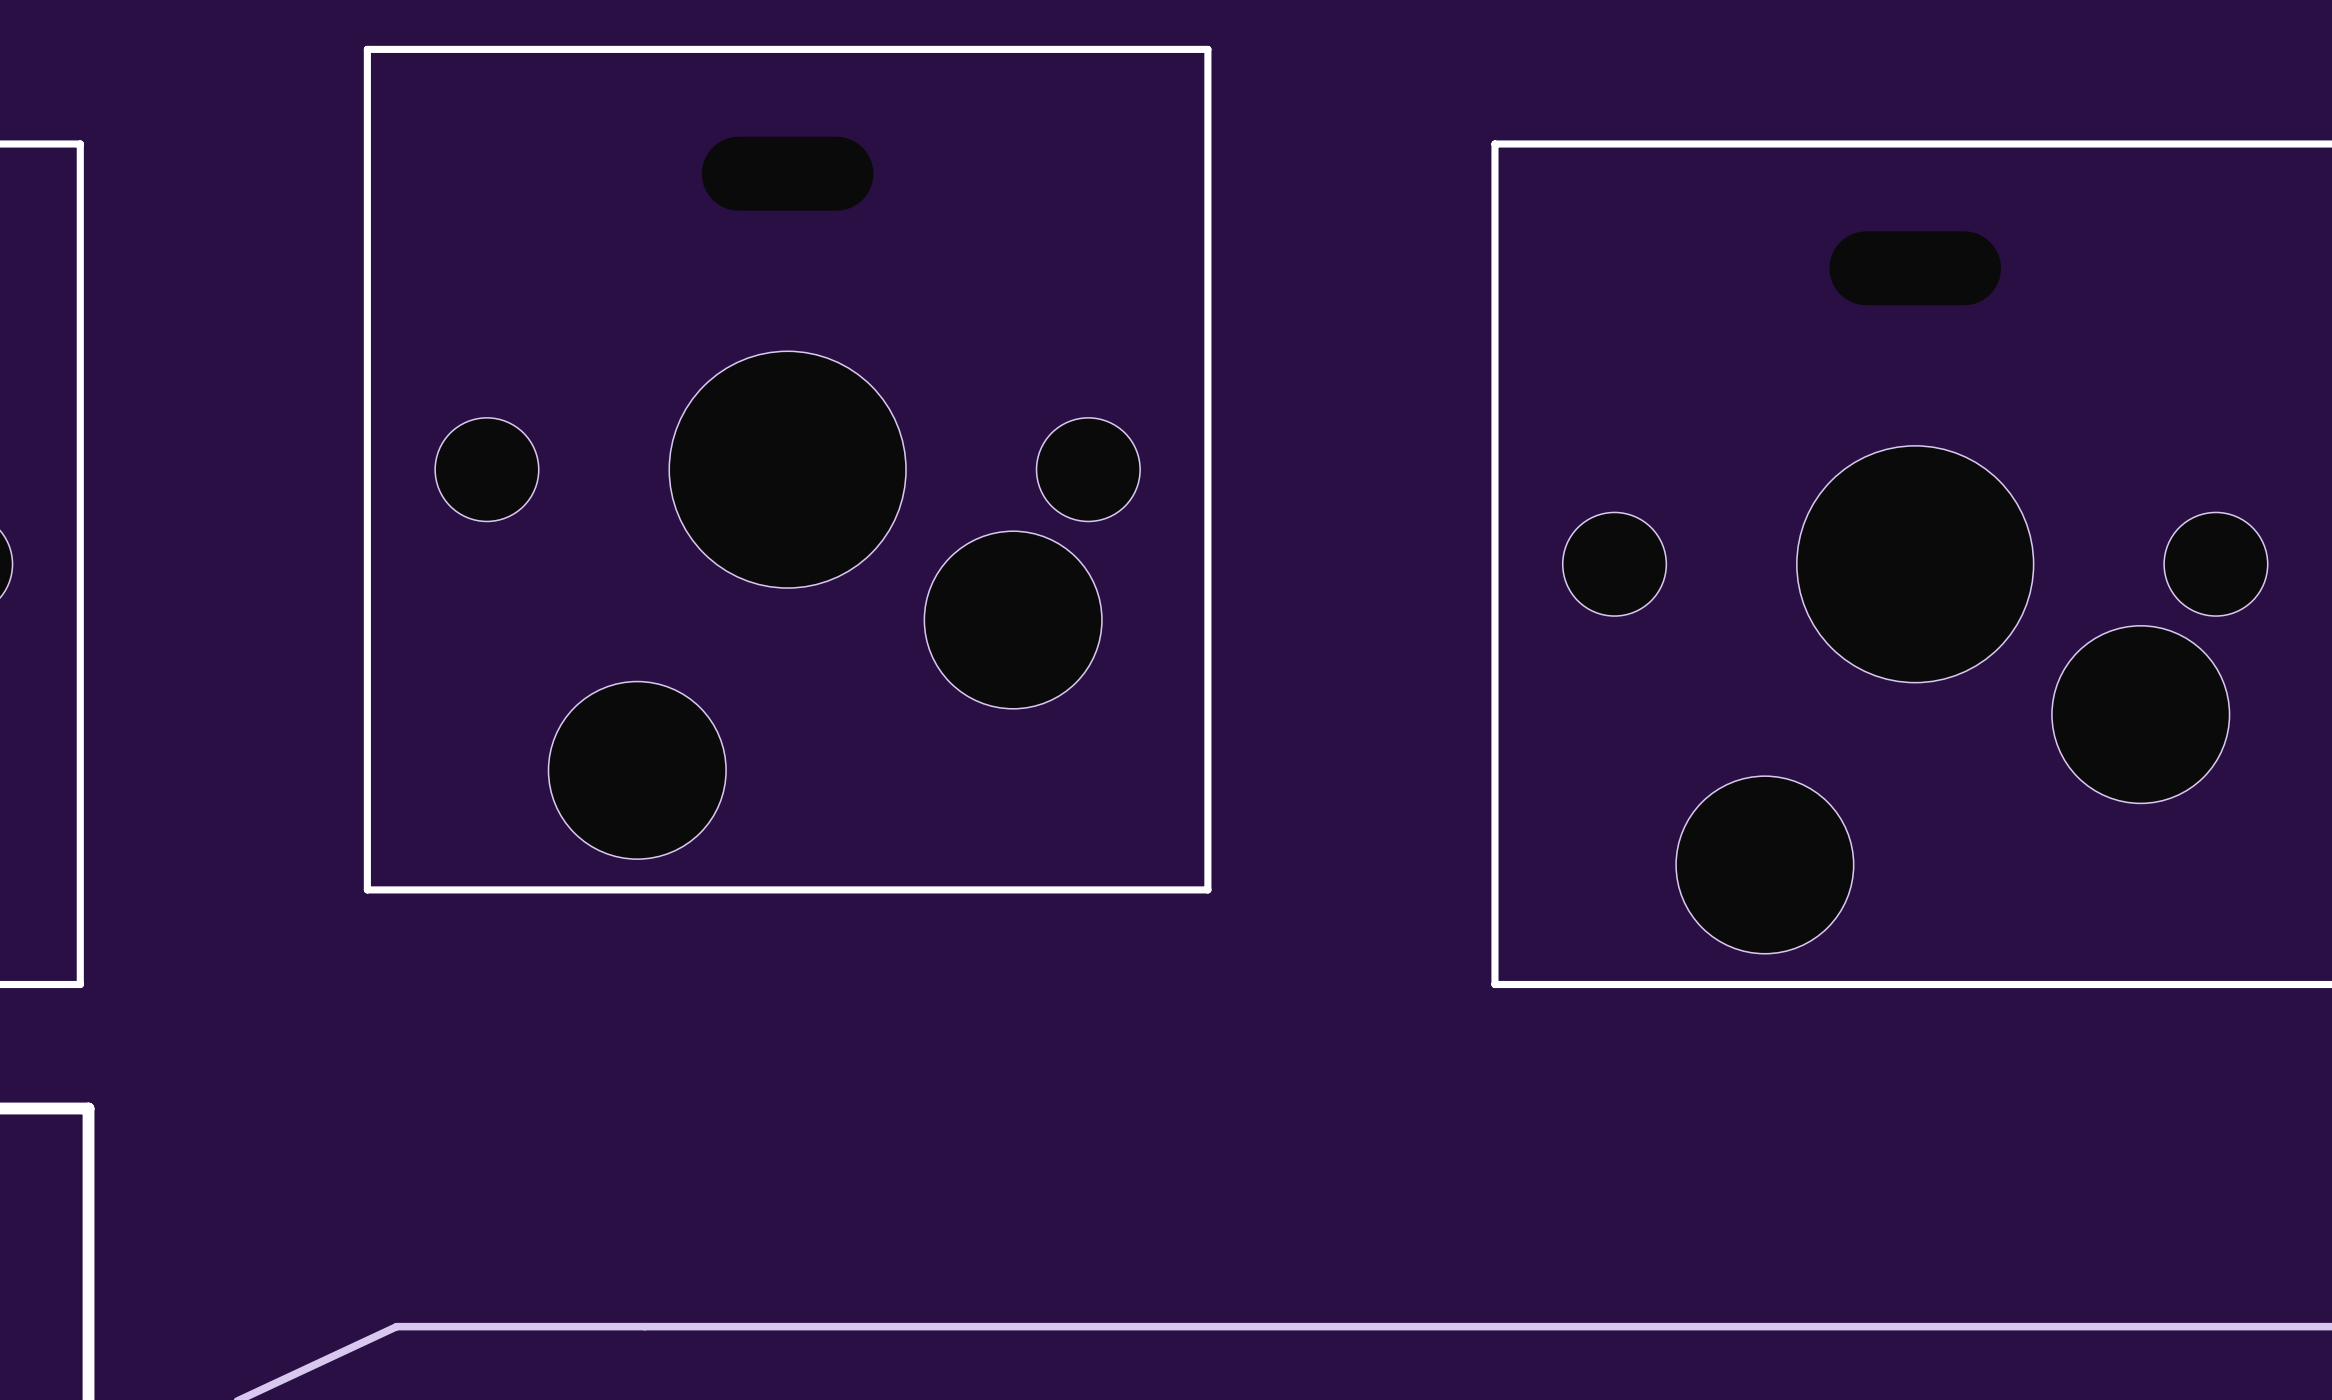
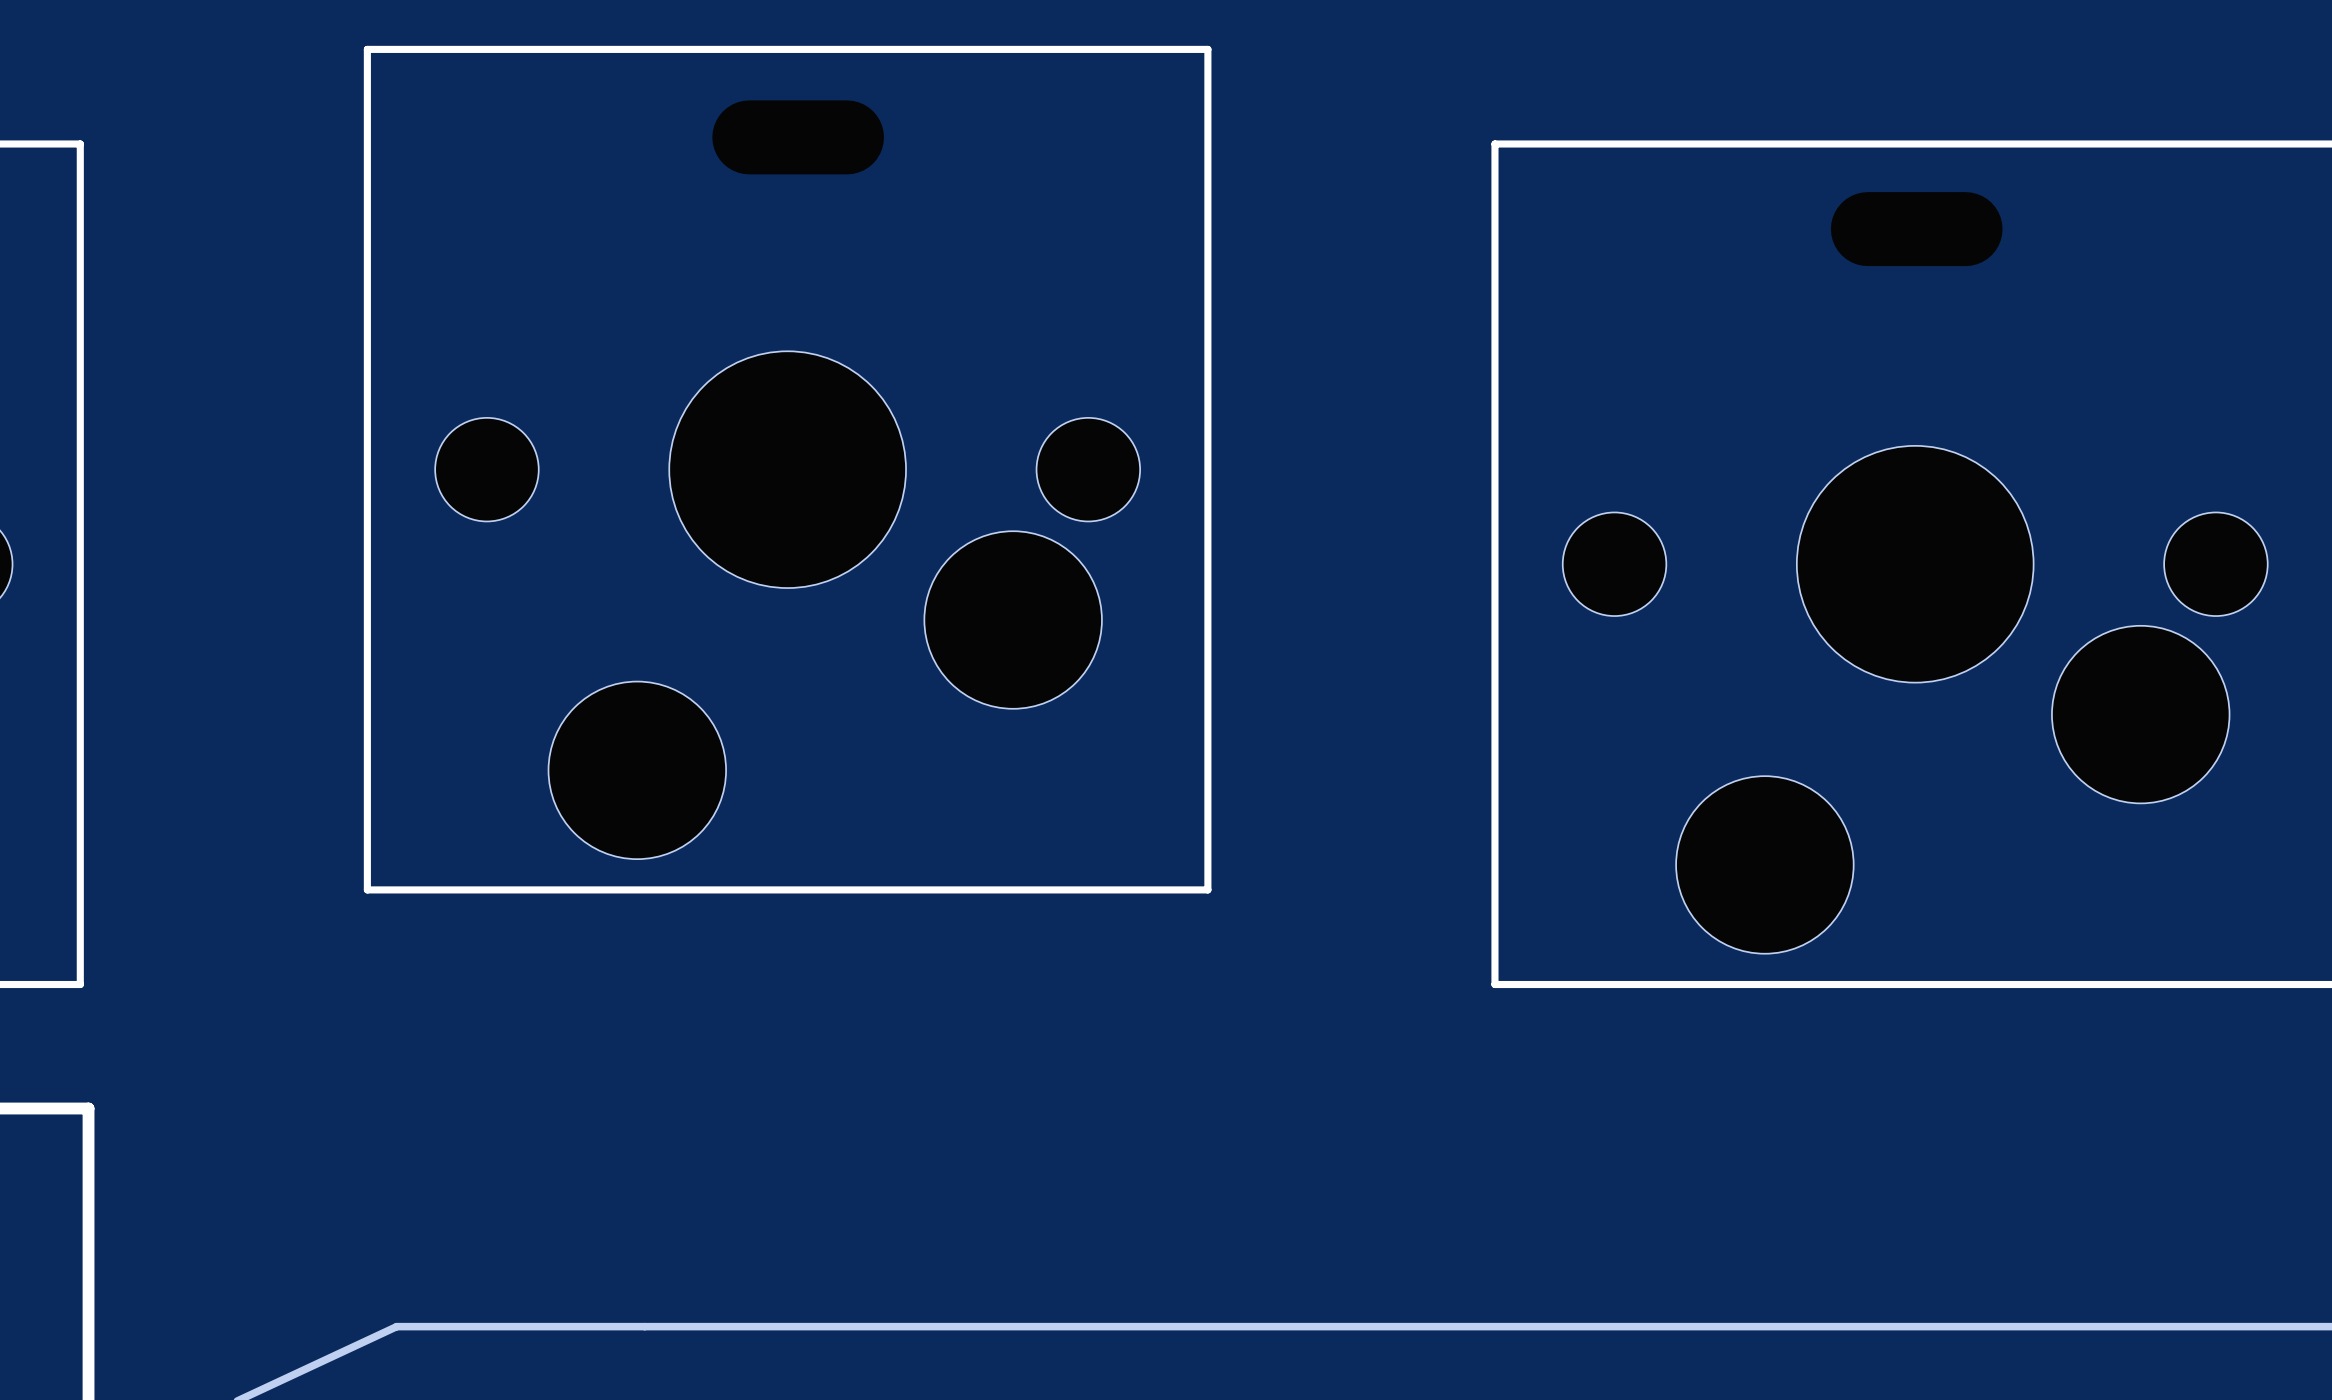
part position: (787, 173) -> (798, 137)
part position: (1915, 268) -> (1916, 229)

